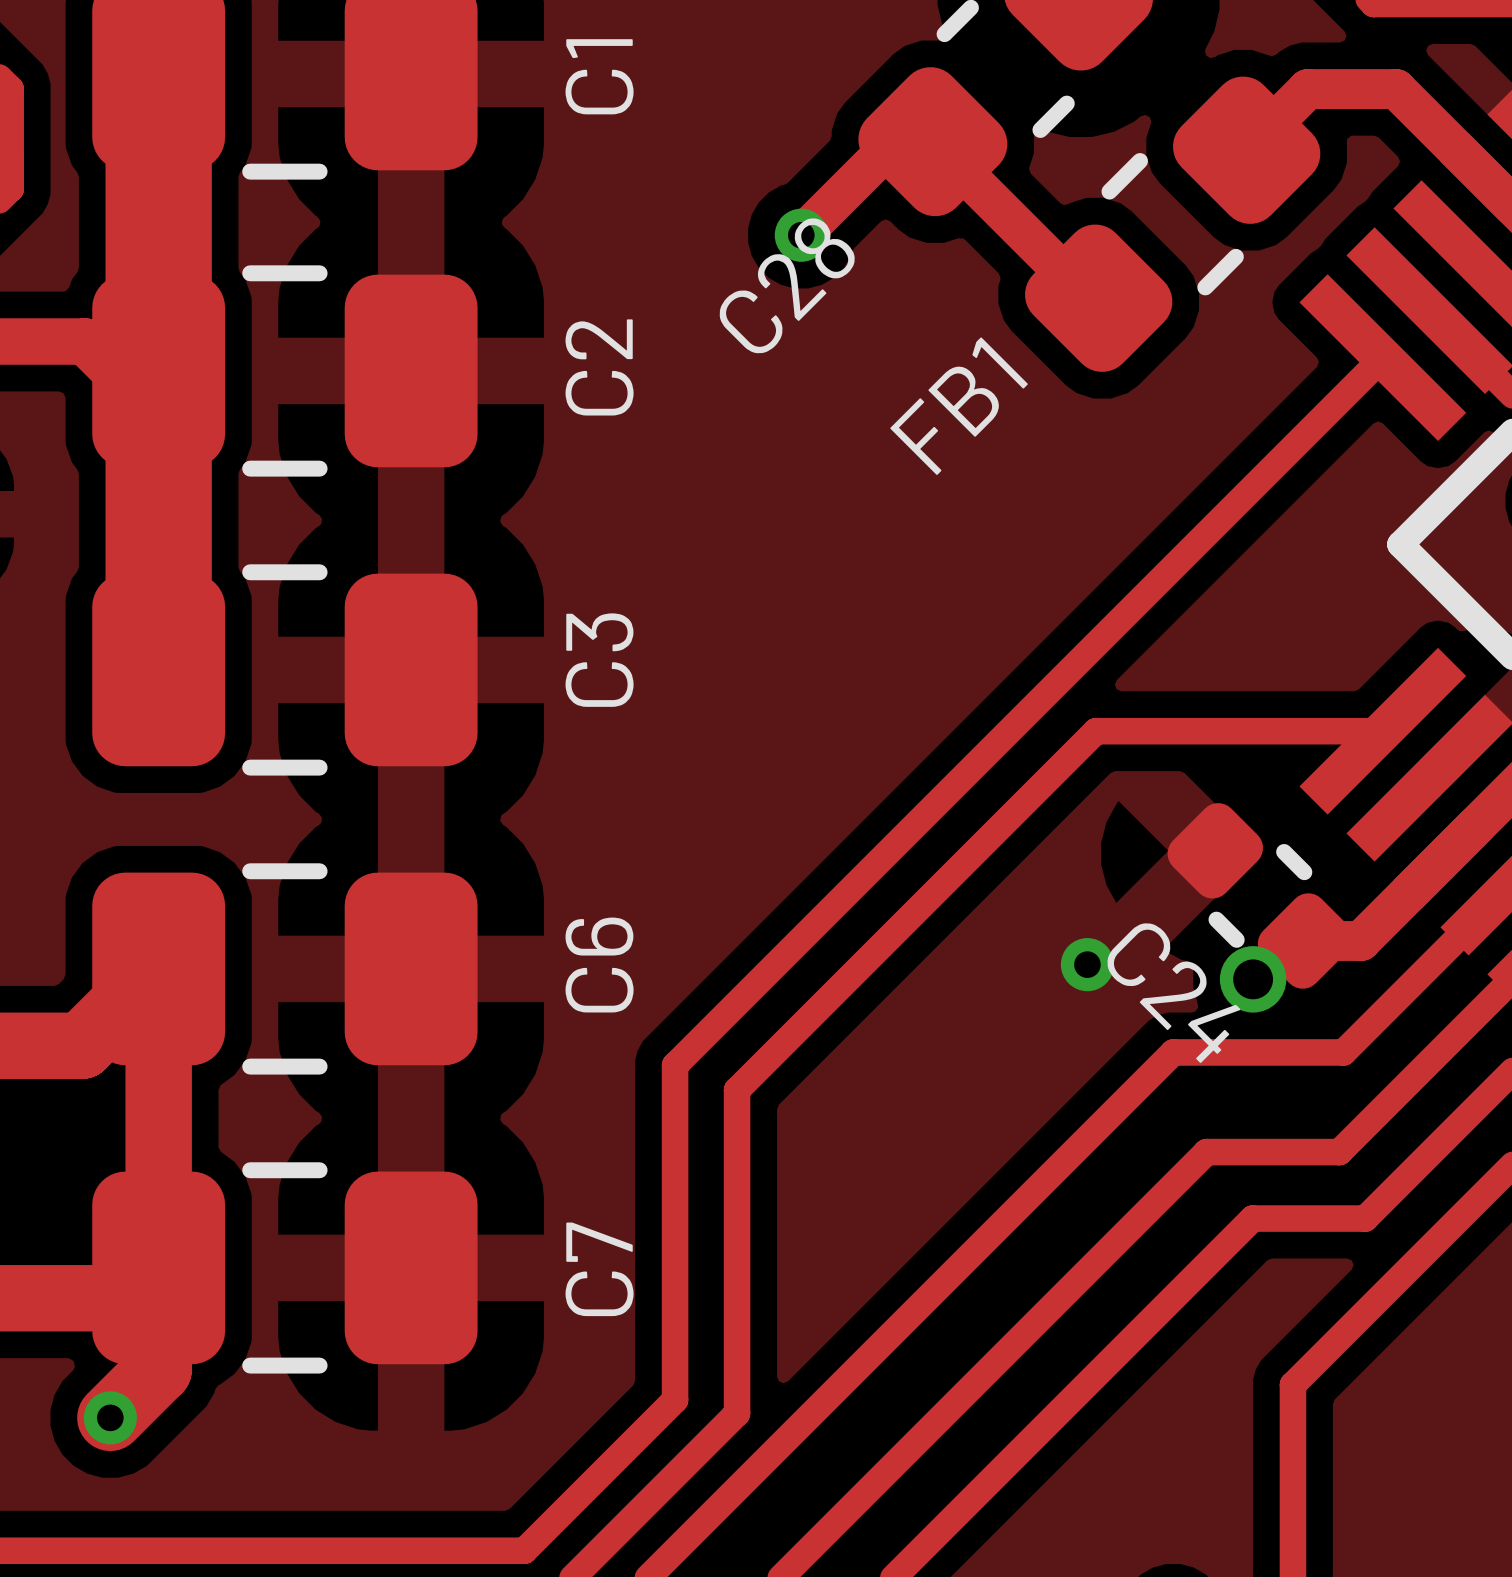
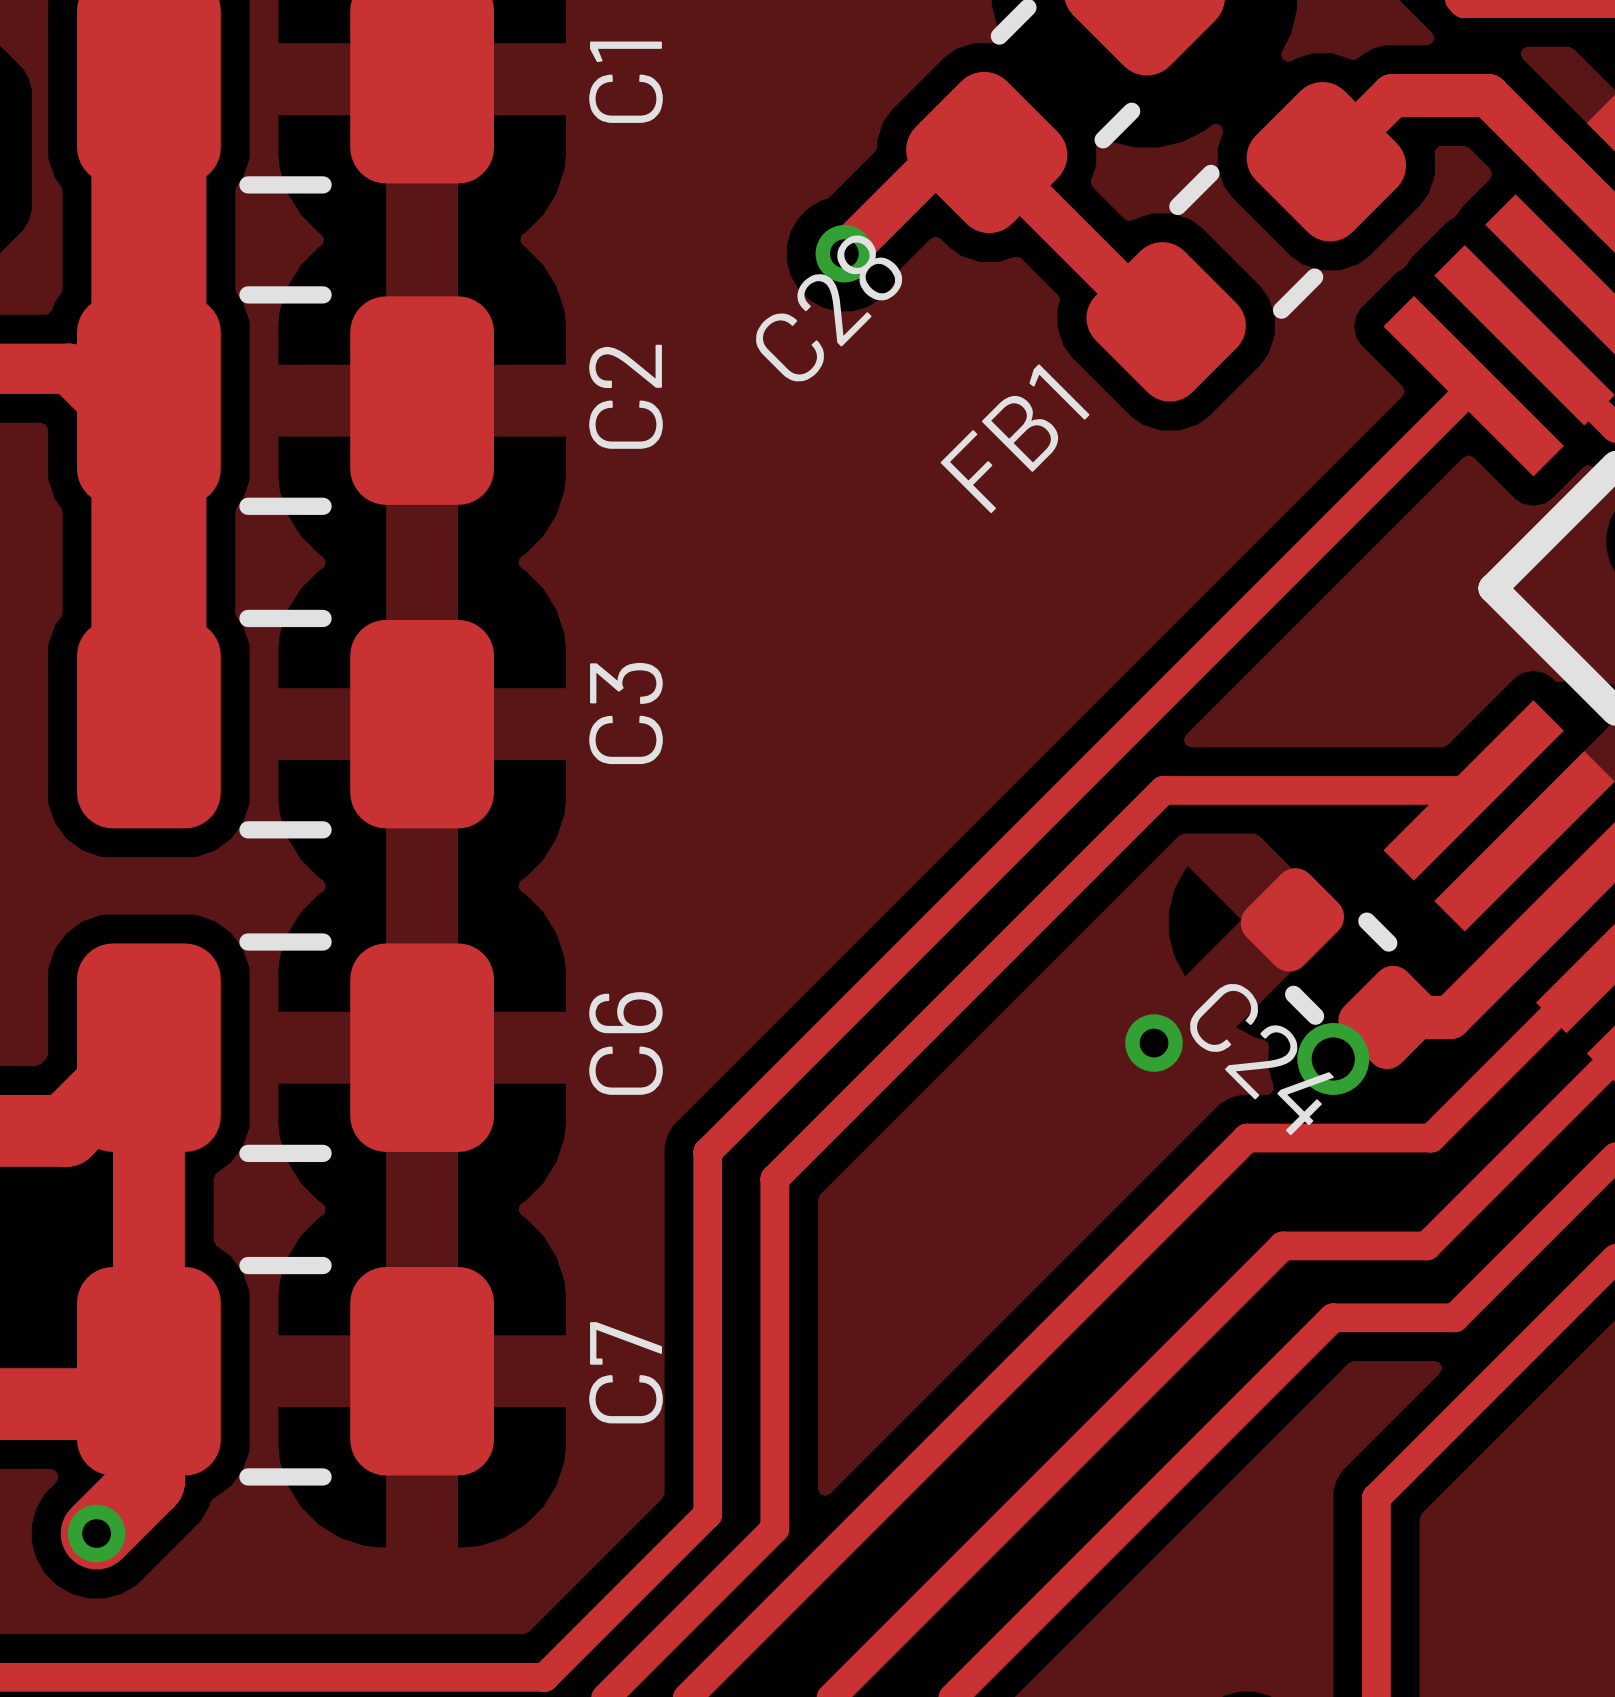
C24 name position: C24 (1173, 992) -> C24 (1261, 1059)

